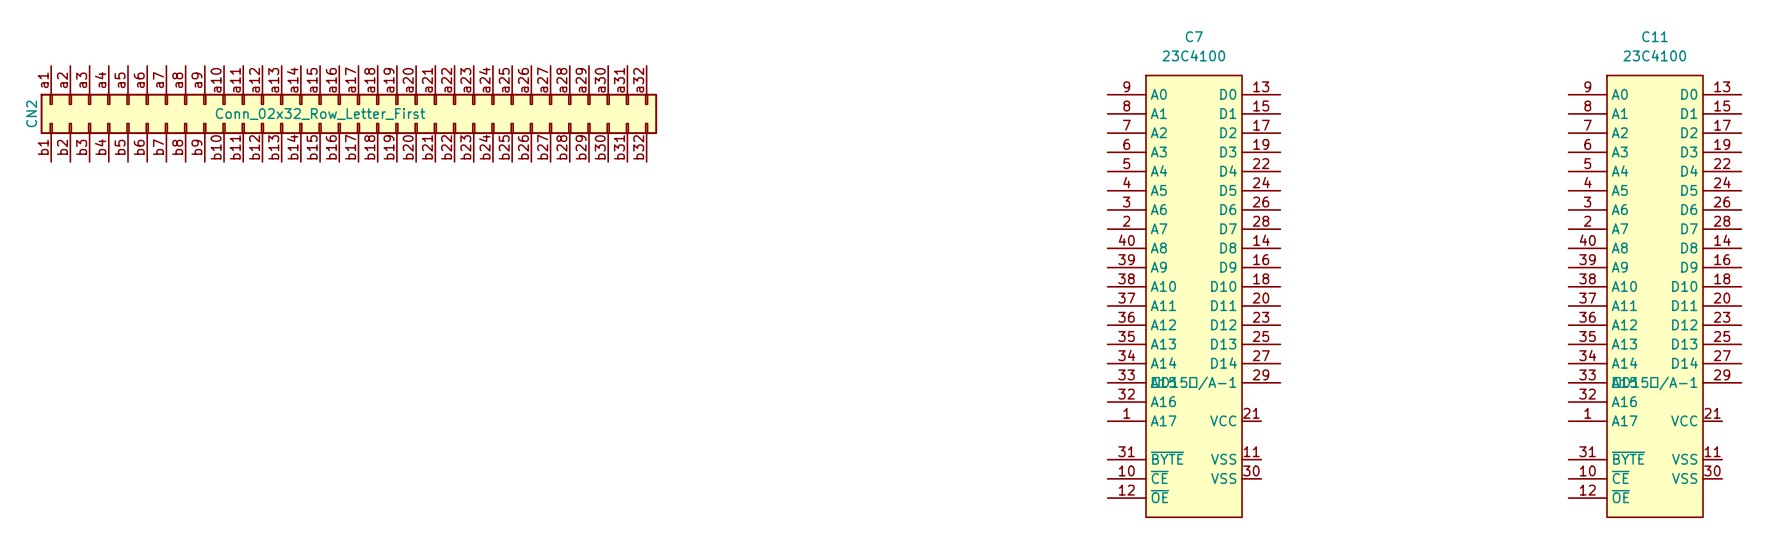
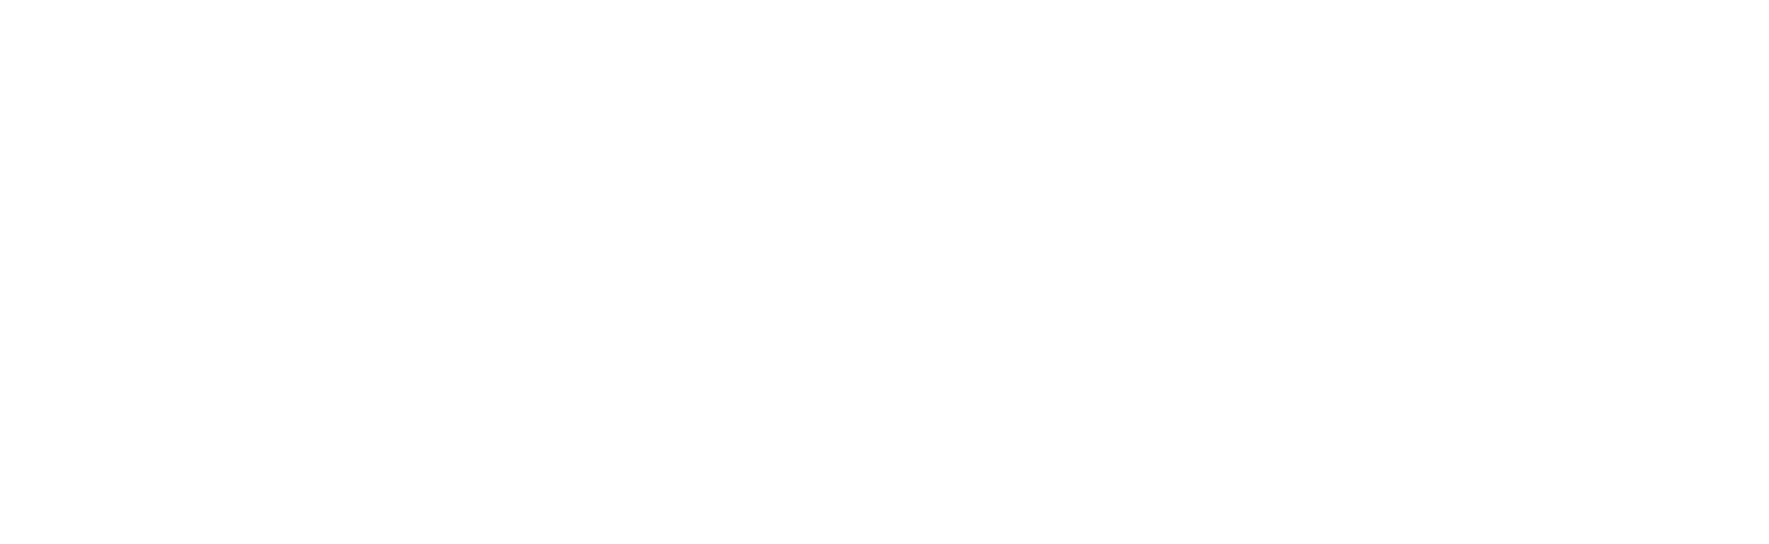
CN2: Conn_02x32_Row_Letter_First (348, 113) -> none
C7: 23C4100 (1194, 296) -> none
C11: 23C4100 (1655, 296) -> none

